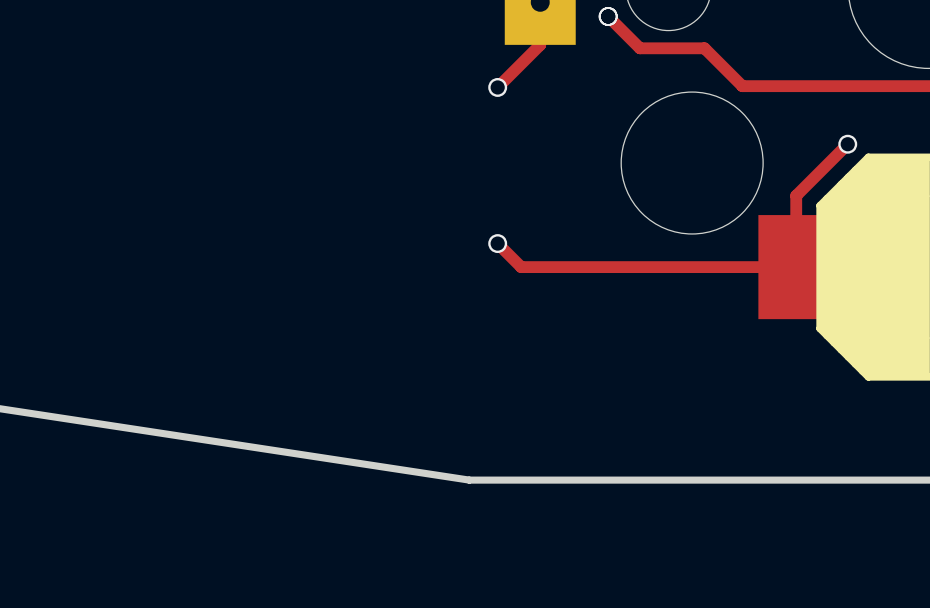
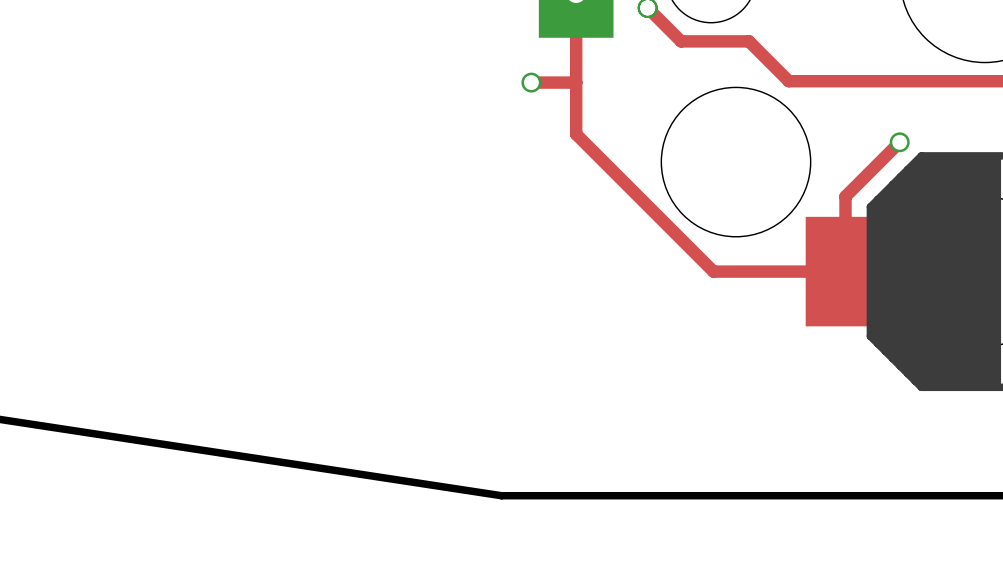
track: (540, 44) (497, 87) -> (576, 82) (531, 82)
track: (497, 243) (521, 267) (670, 267) -> (576, 37) (576, 134) (713, 271)
via: (497, 243) -> none

